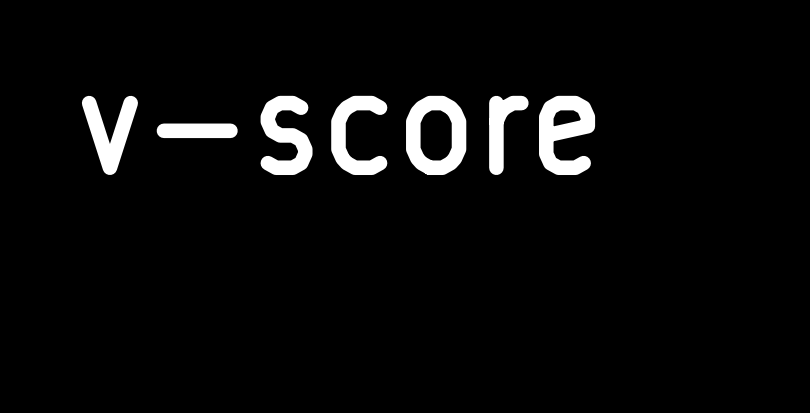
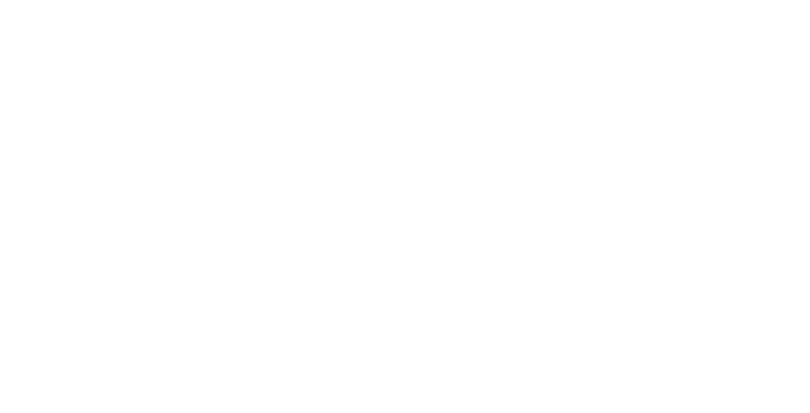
text: v-score (338, 135) -> none

